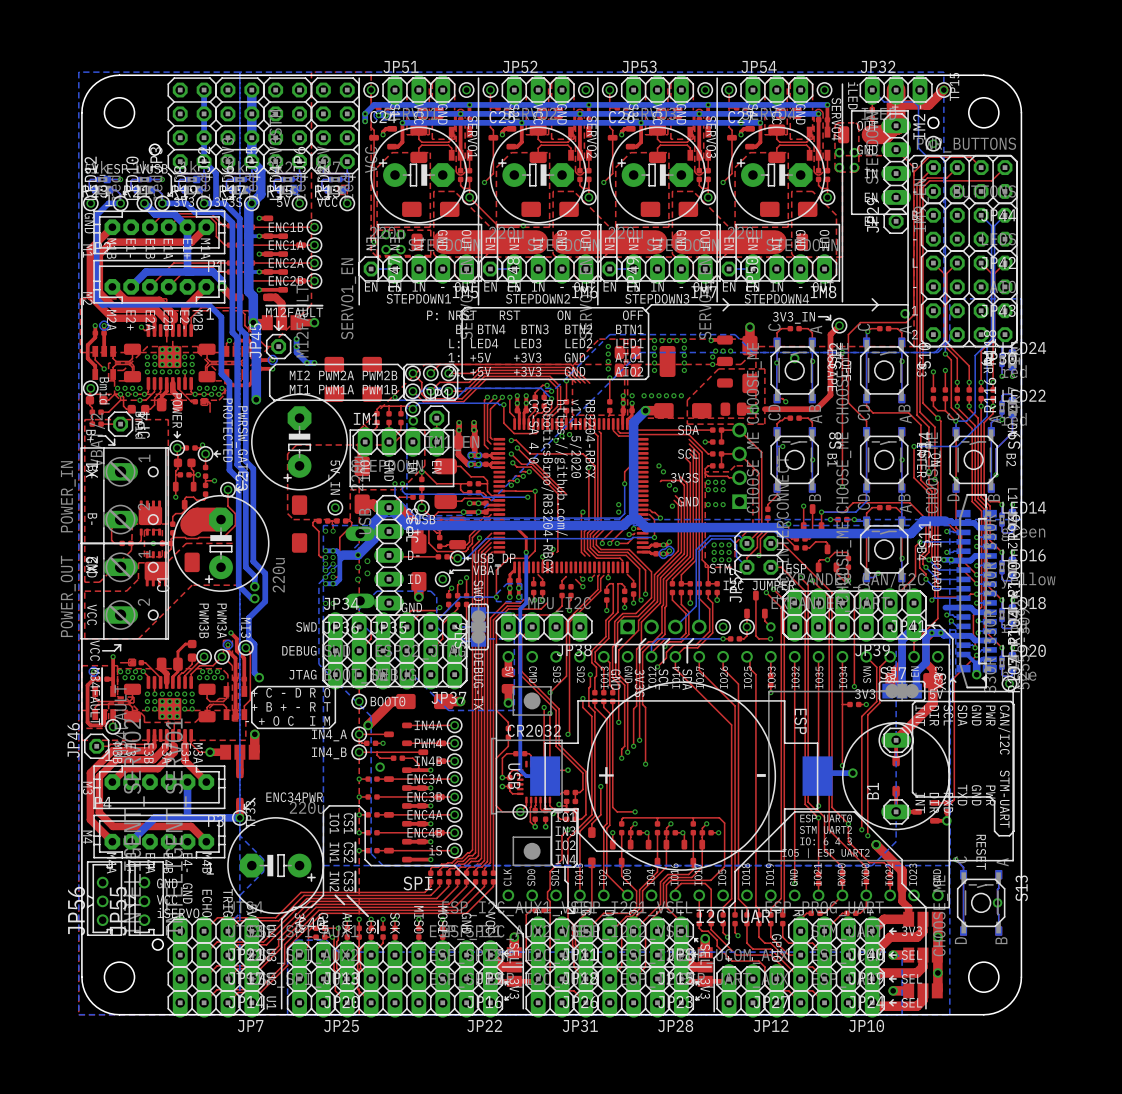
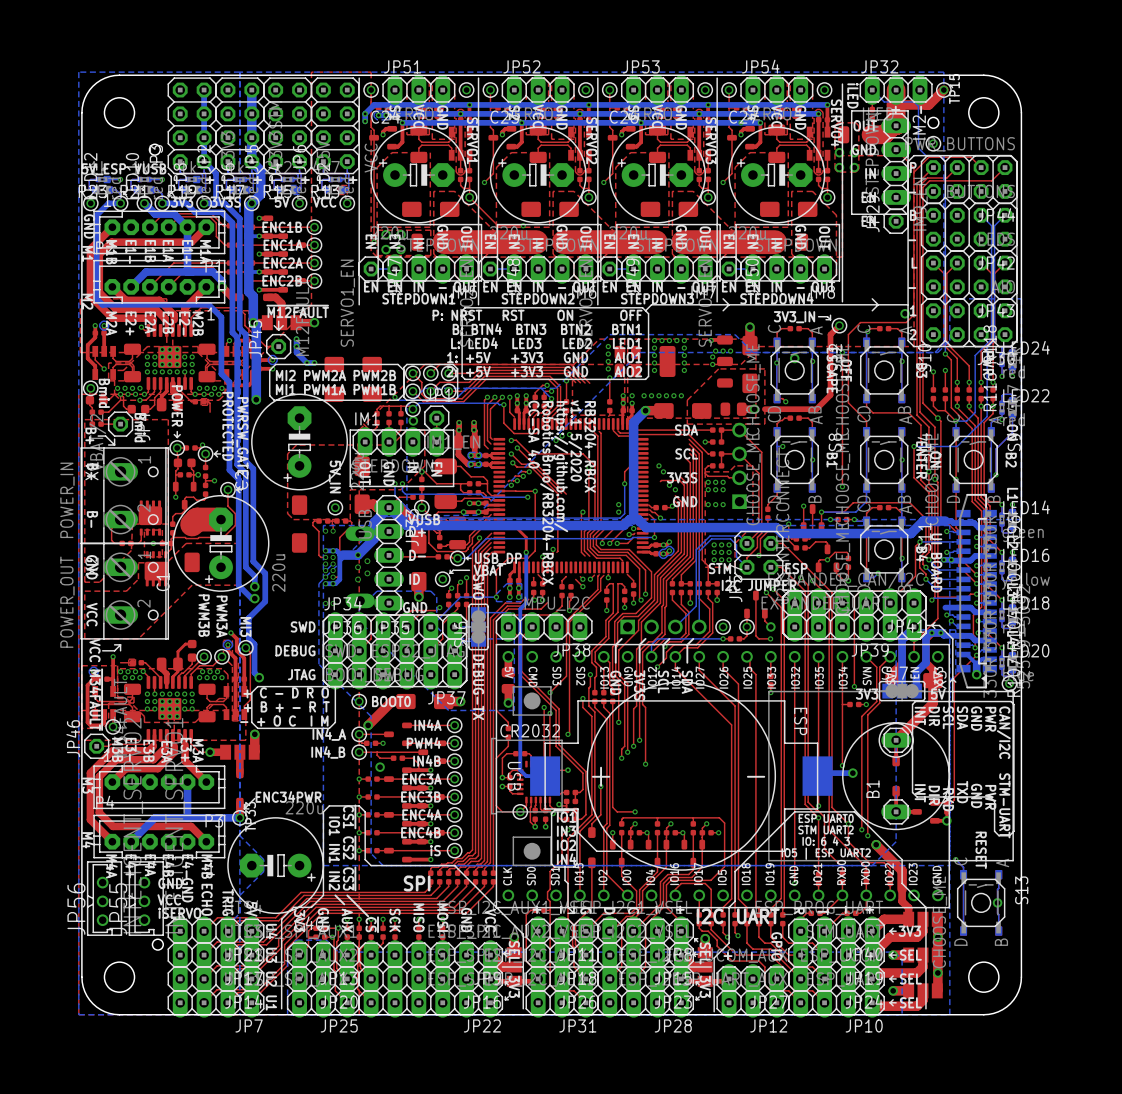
top track: none -> (649, 505) (651, 507) (656, 507)
part: none -> (660, 507)
top track: none -> (670, 507) (664, 507)

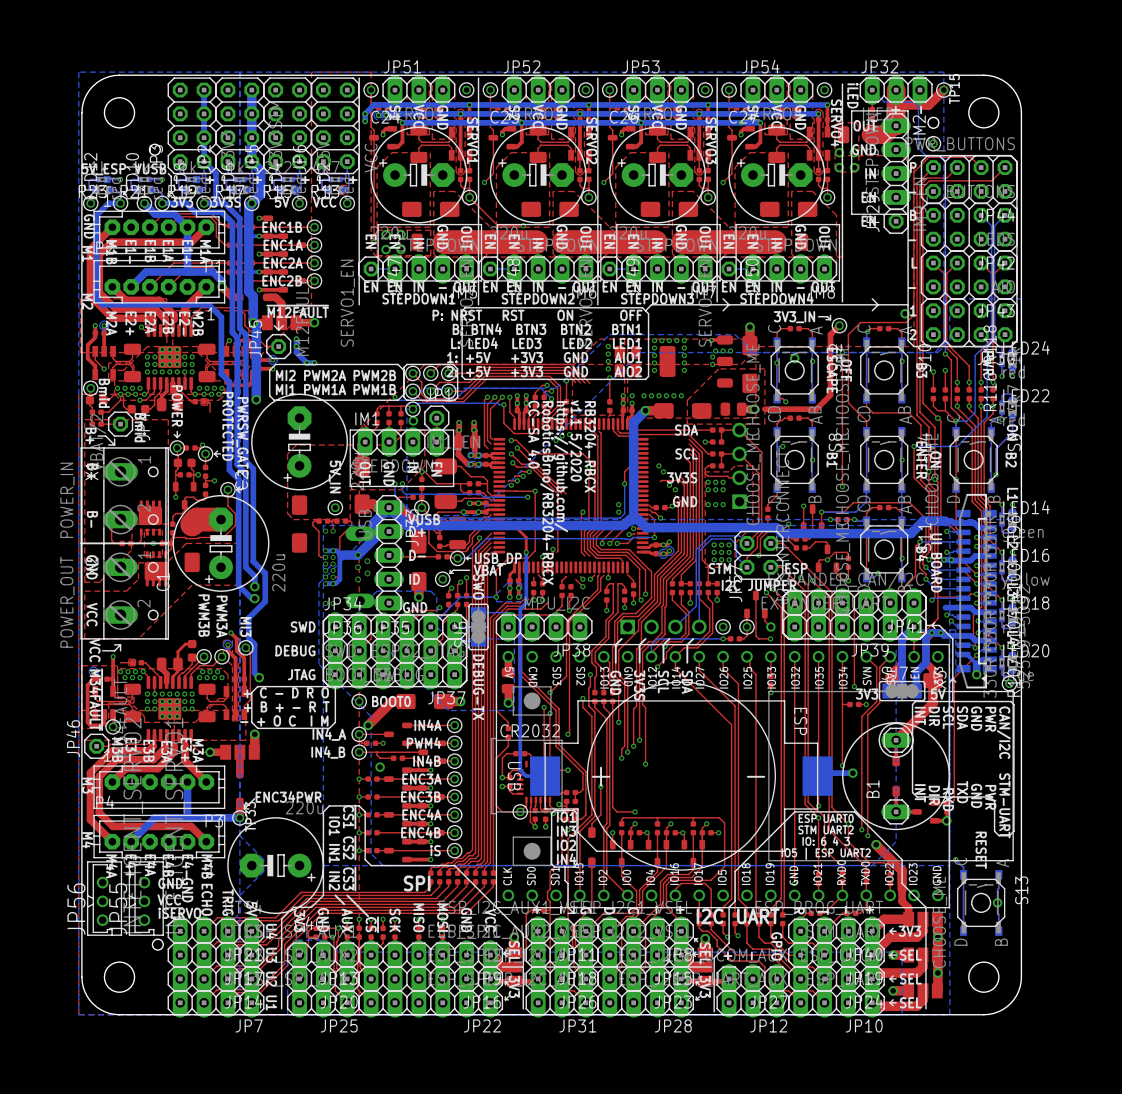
part: (353, 364) -> none
part: (353, 394) -> none

